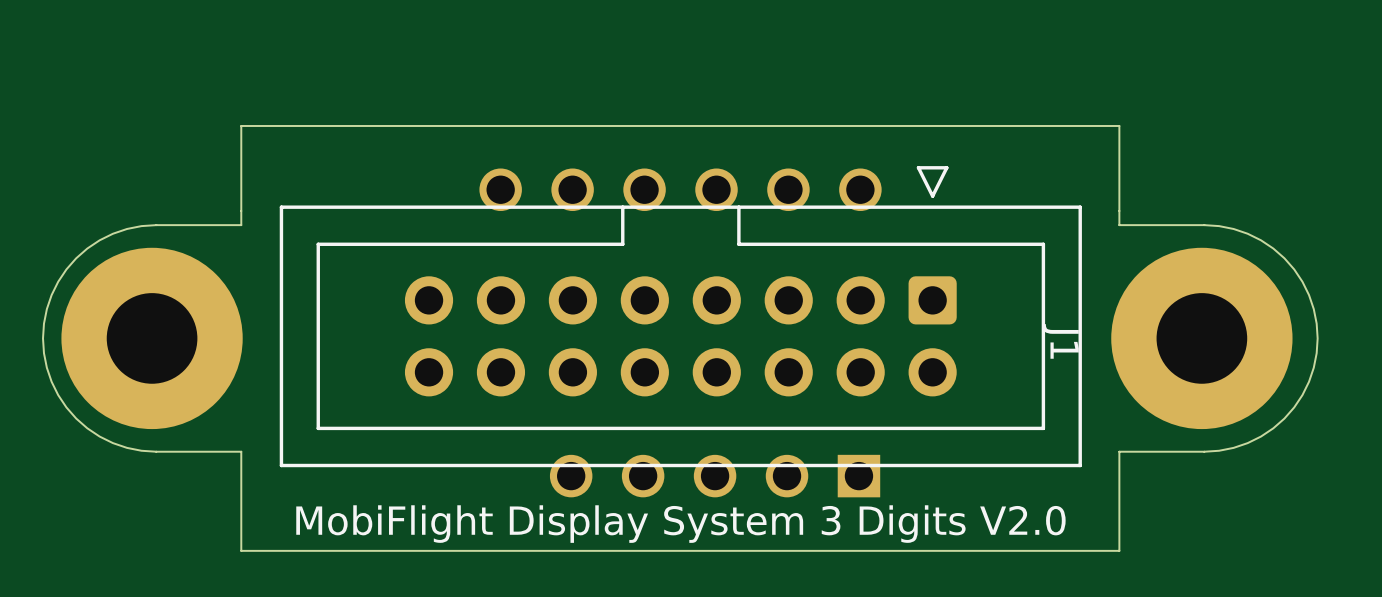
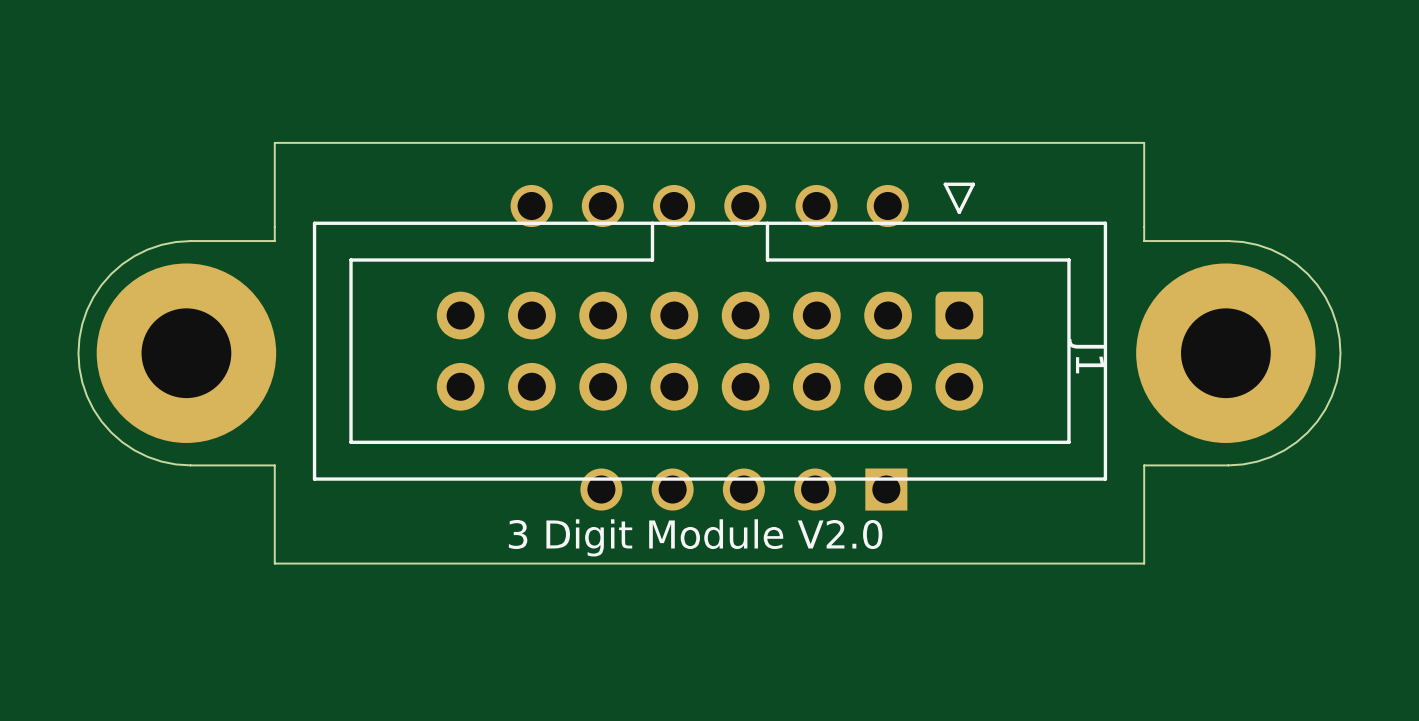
text: MobiFlight Display System 3 Digits V2.0 (680, 524) -> 3 Digit Module V2.0 (695, 537)

